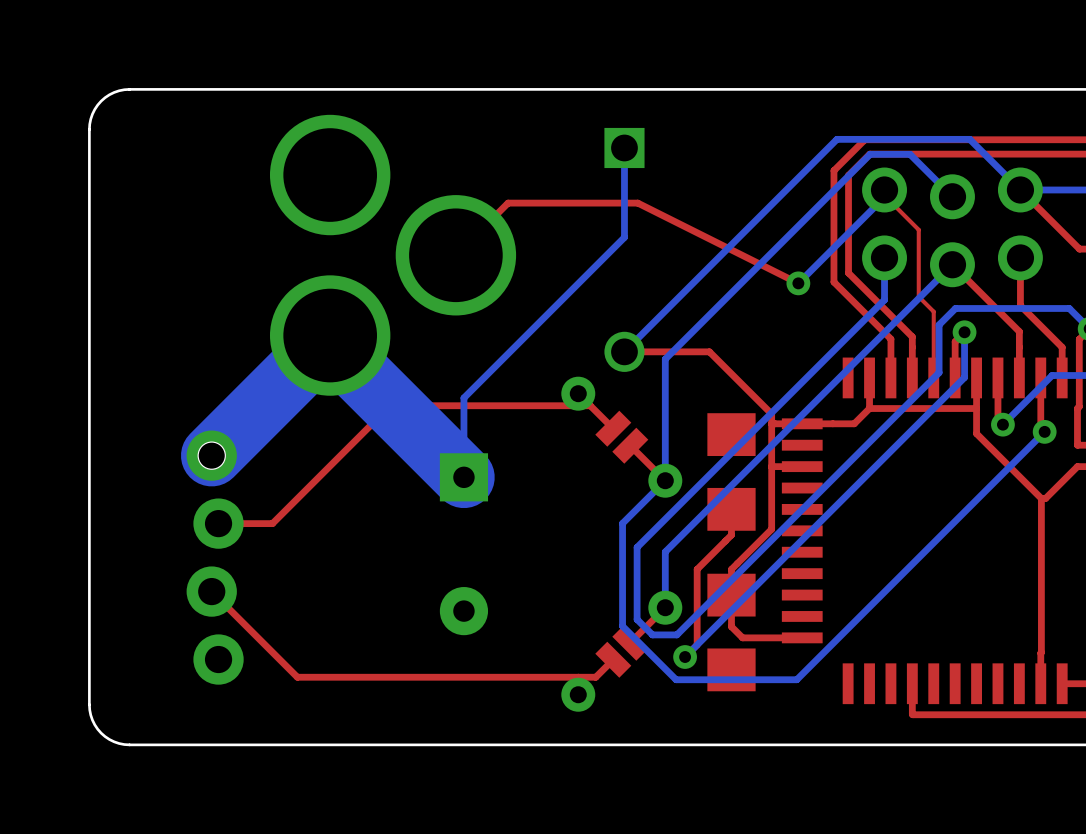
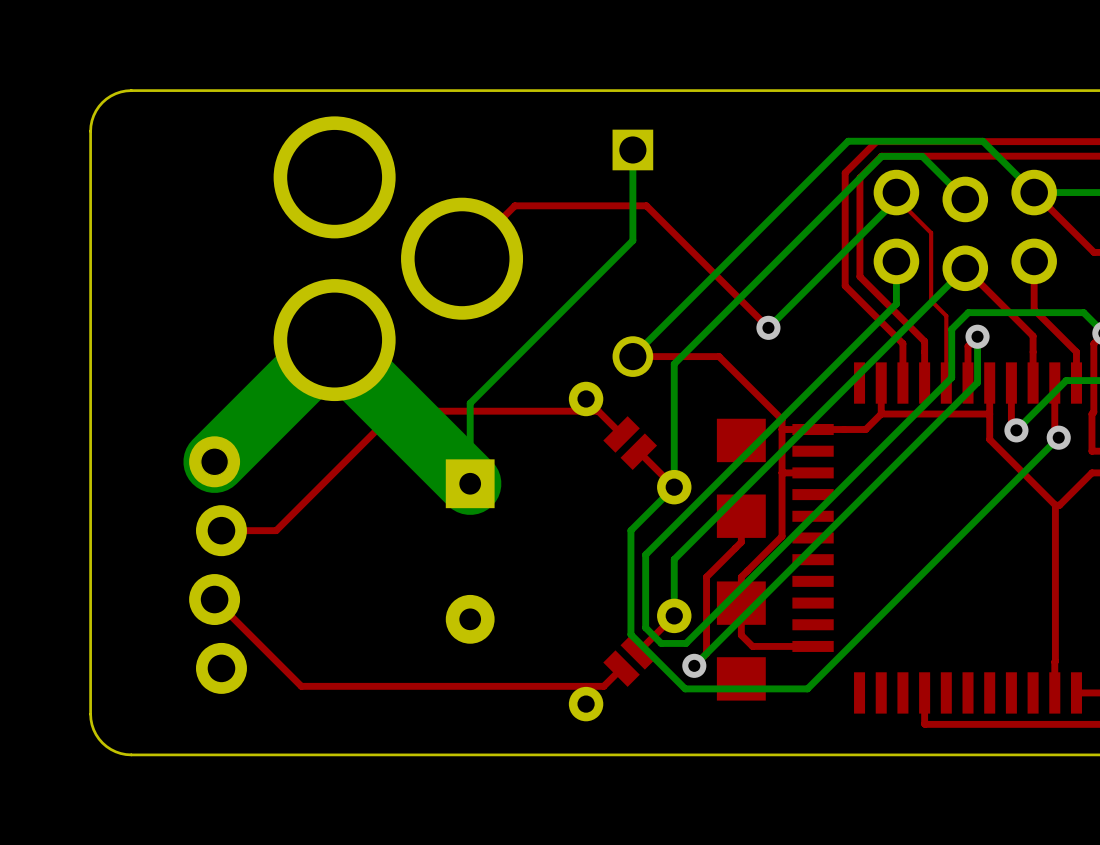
top track: (637, 203) (798, 283) -> (646, 205) (768, 327)
bottom track: none -> (809, 287) (768, 327)
via position: (798, 283) -> (768, 327)

